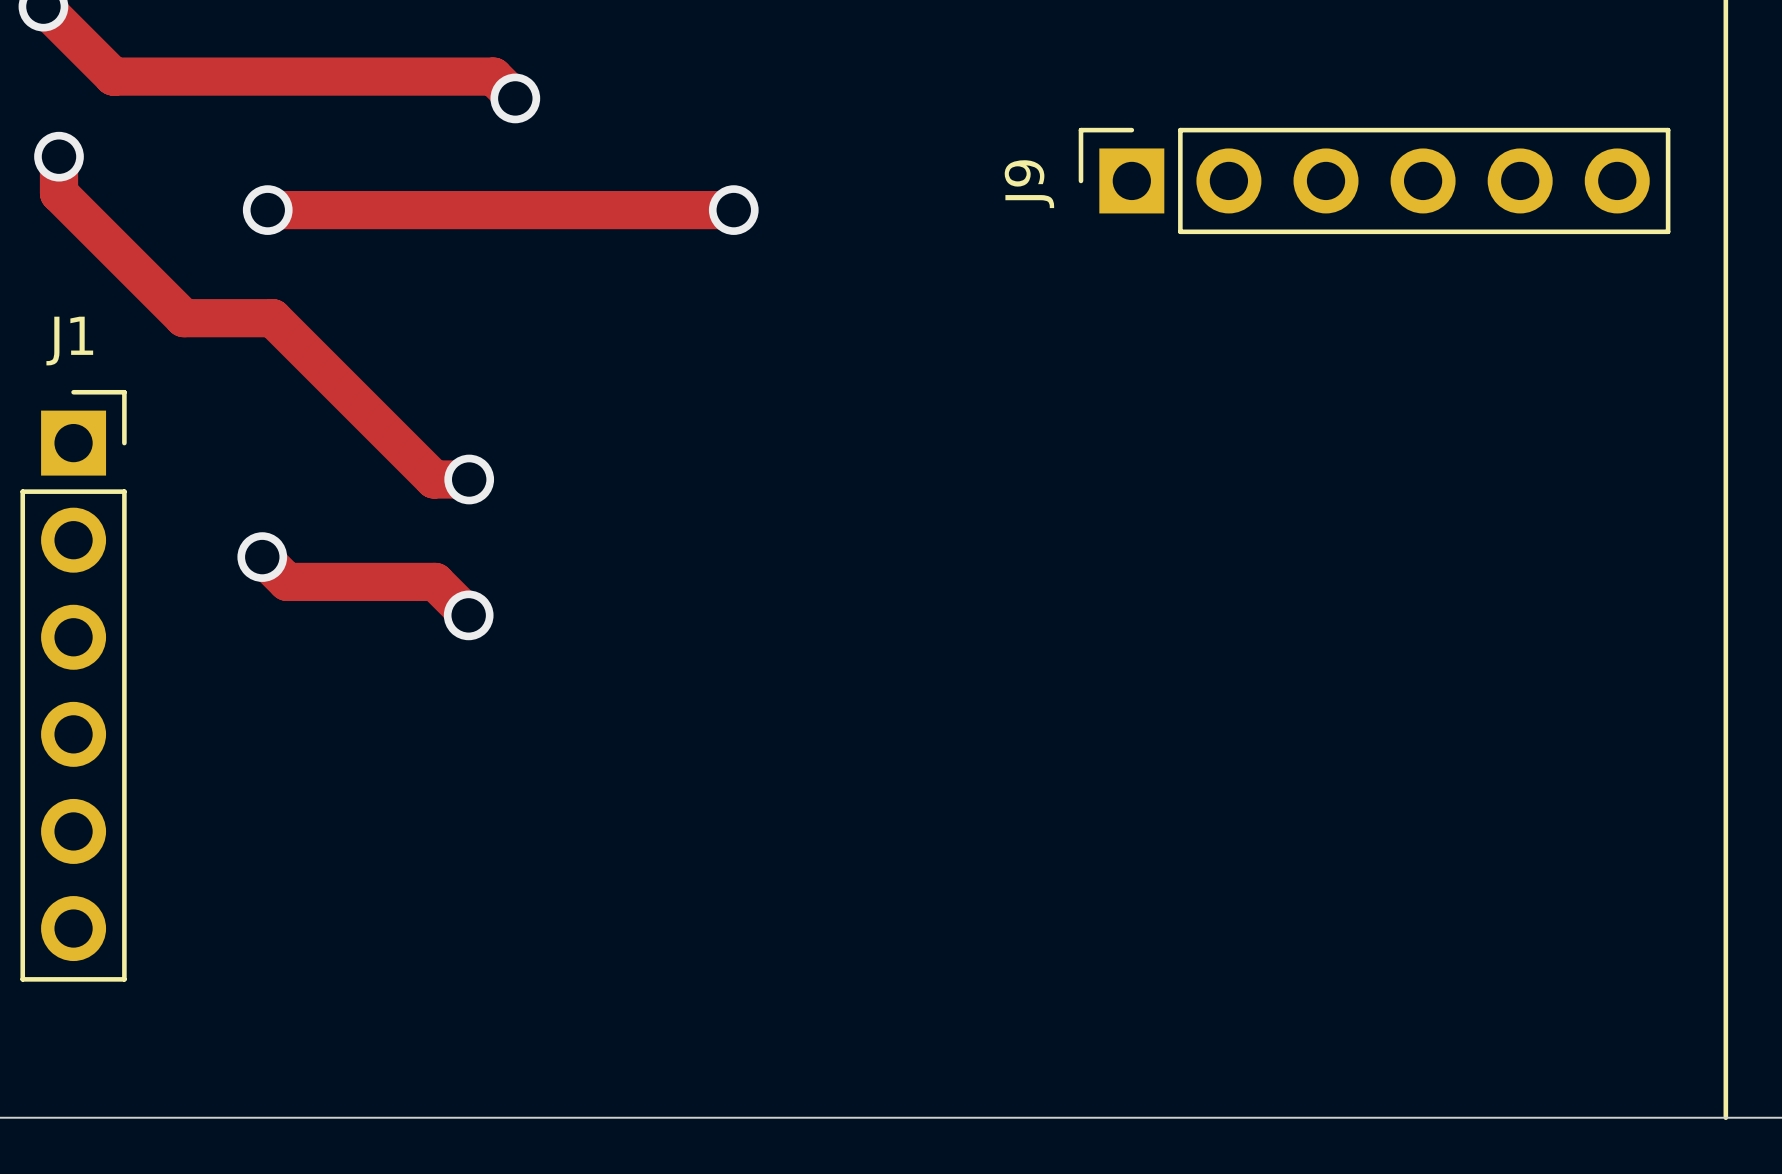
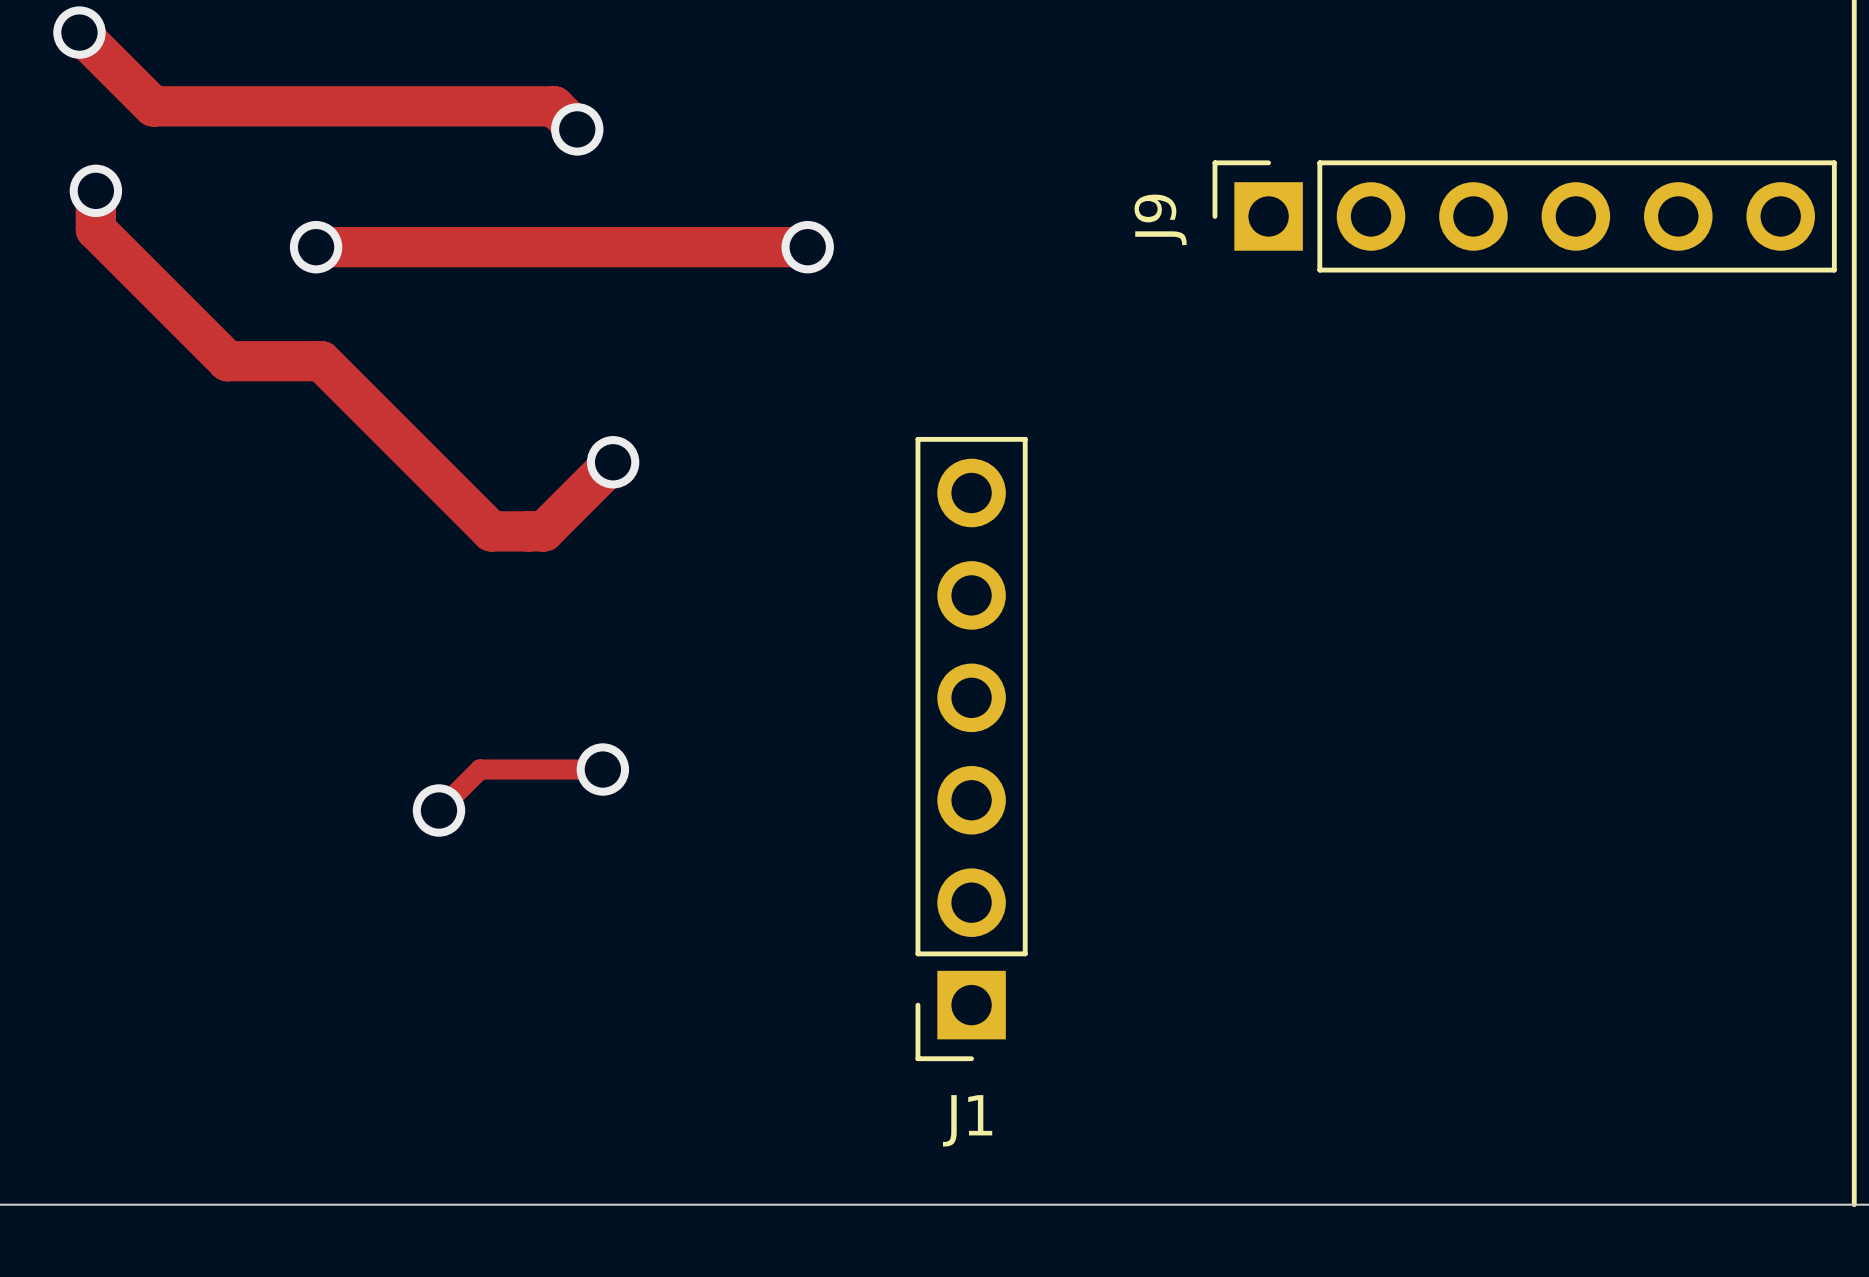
J9 position: (1374, 180) -> (1524, 216)
track: none -> (613, 462) (543, 531) (528, 531)
via position: (469, 479) -> (613, 462)
track: (262, 557) (287, 581) (435, 581) (468, 615) -> none
via: (262, 557) -> none
via: (468, 615) -> none
J1 rotation: 0° (73, 685) -> 180° (971, 749)
J1 position: (73, 685) -> (971, 749)
track: none -> (602, 769) (479, 769) (438, 810)
via: none -> (602, 769)
via: none -> (438, 810)

